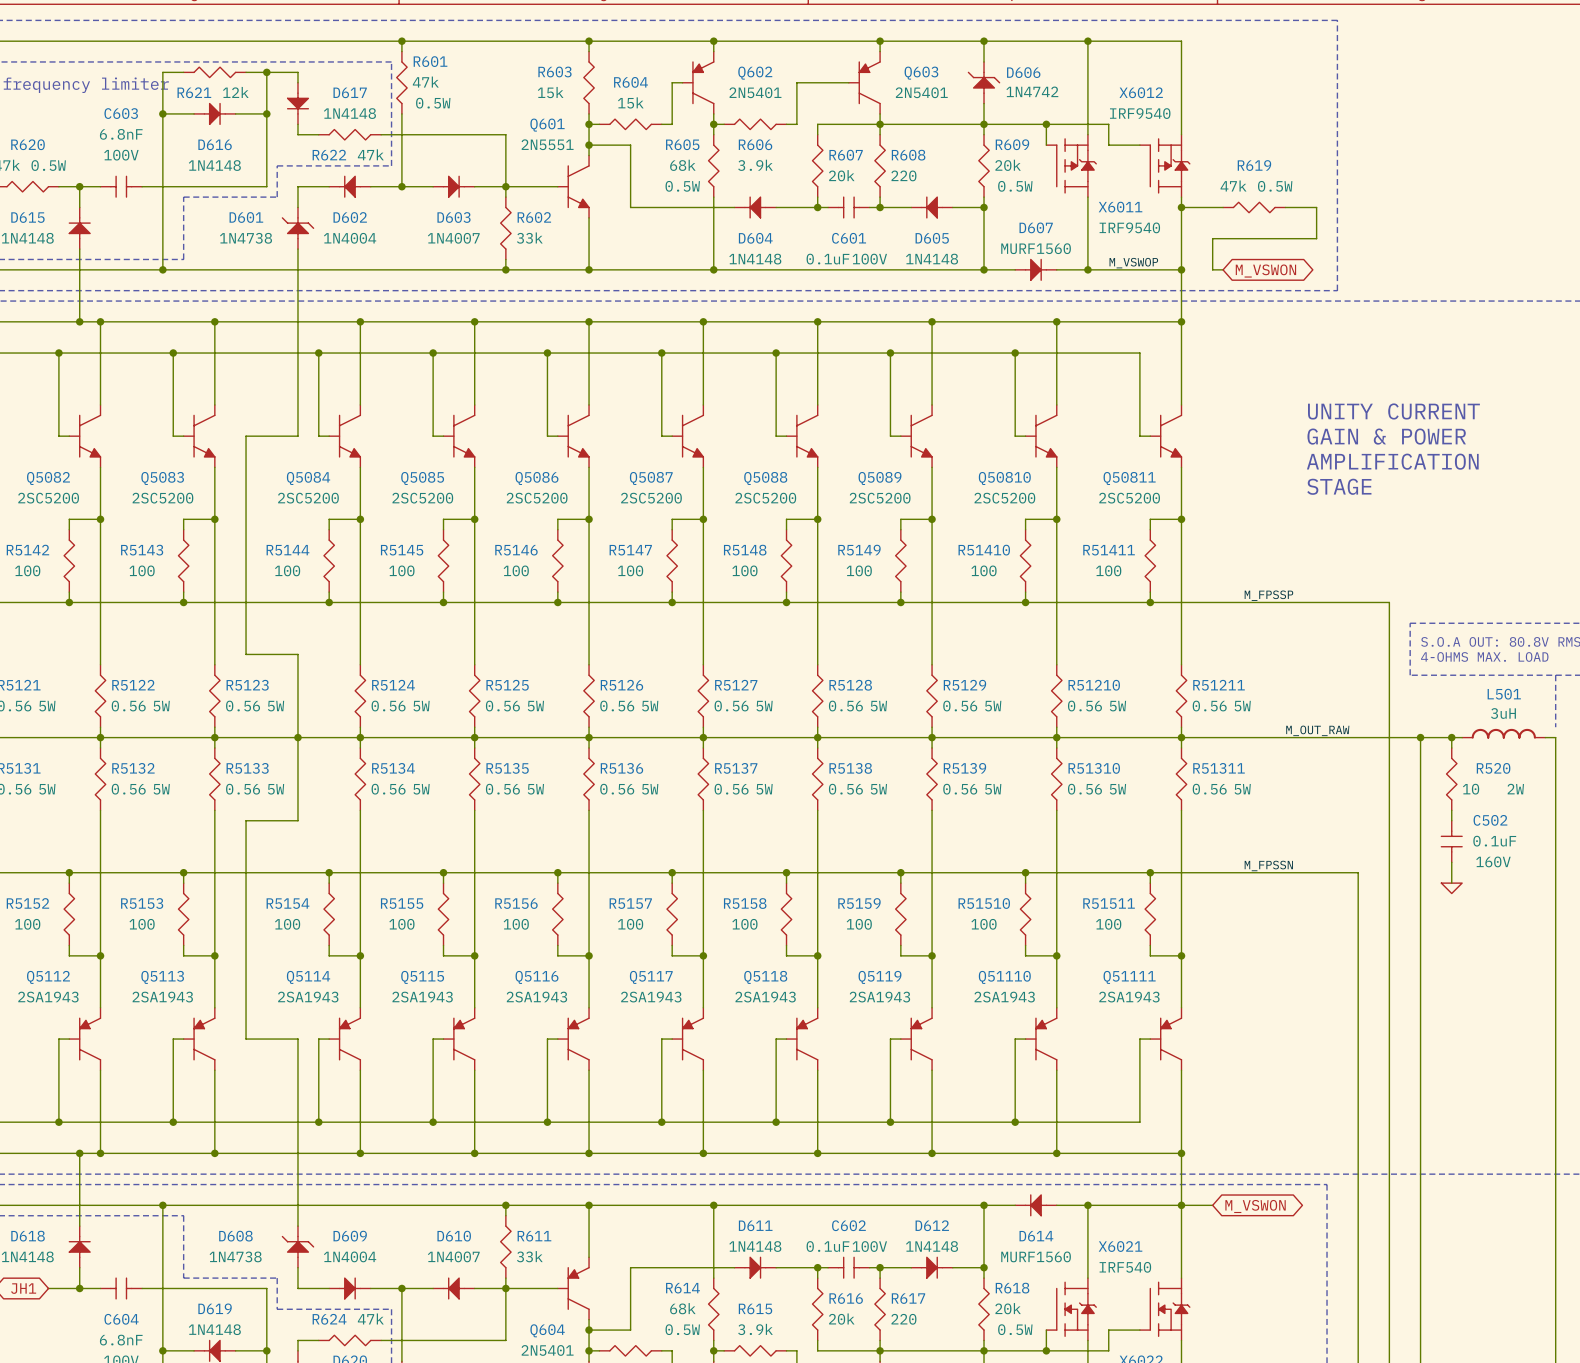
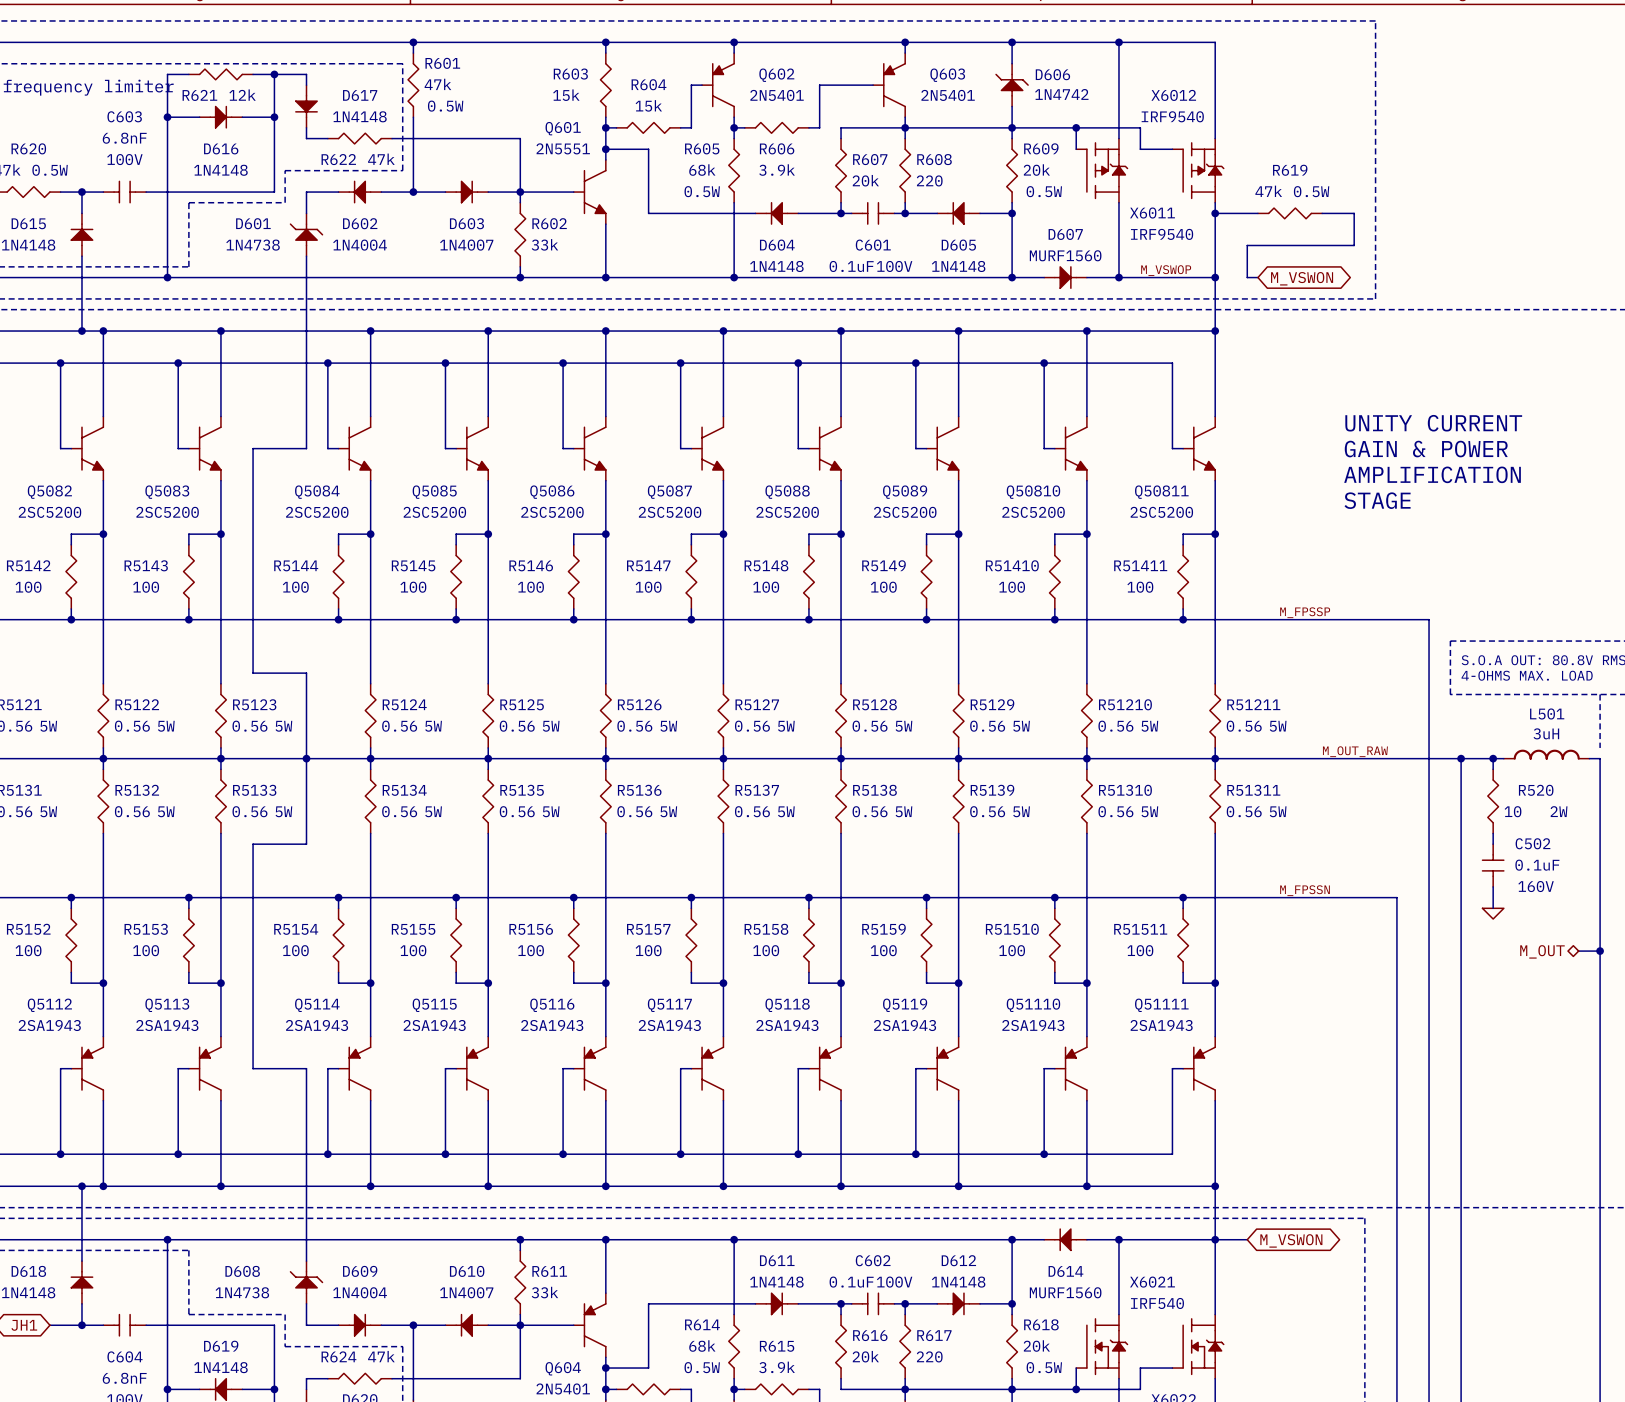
wire: none -> (1578, 951) (1600, 951)
junction: none -> (1600, 951)
hierarchical label: none -> M_OUT (1542, 951)

